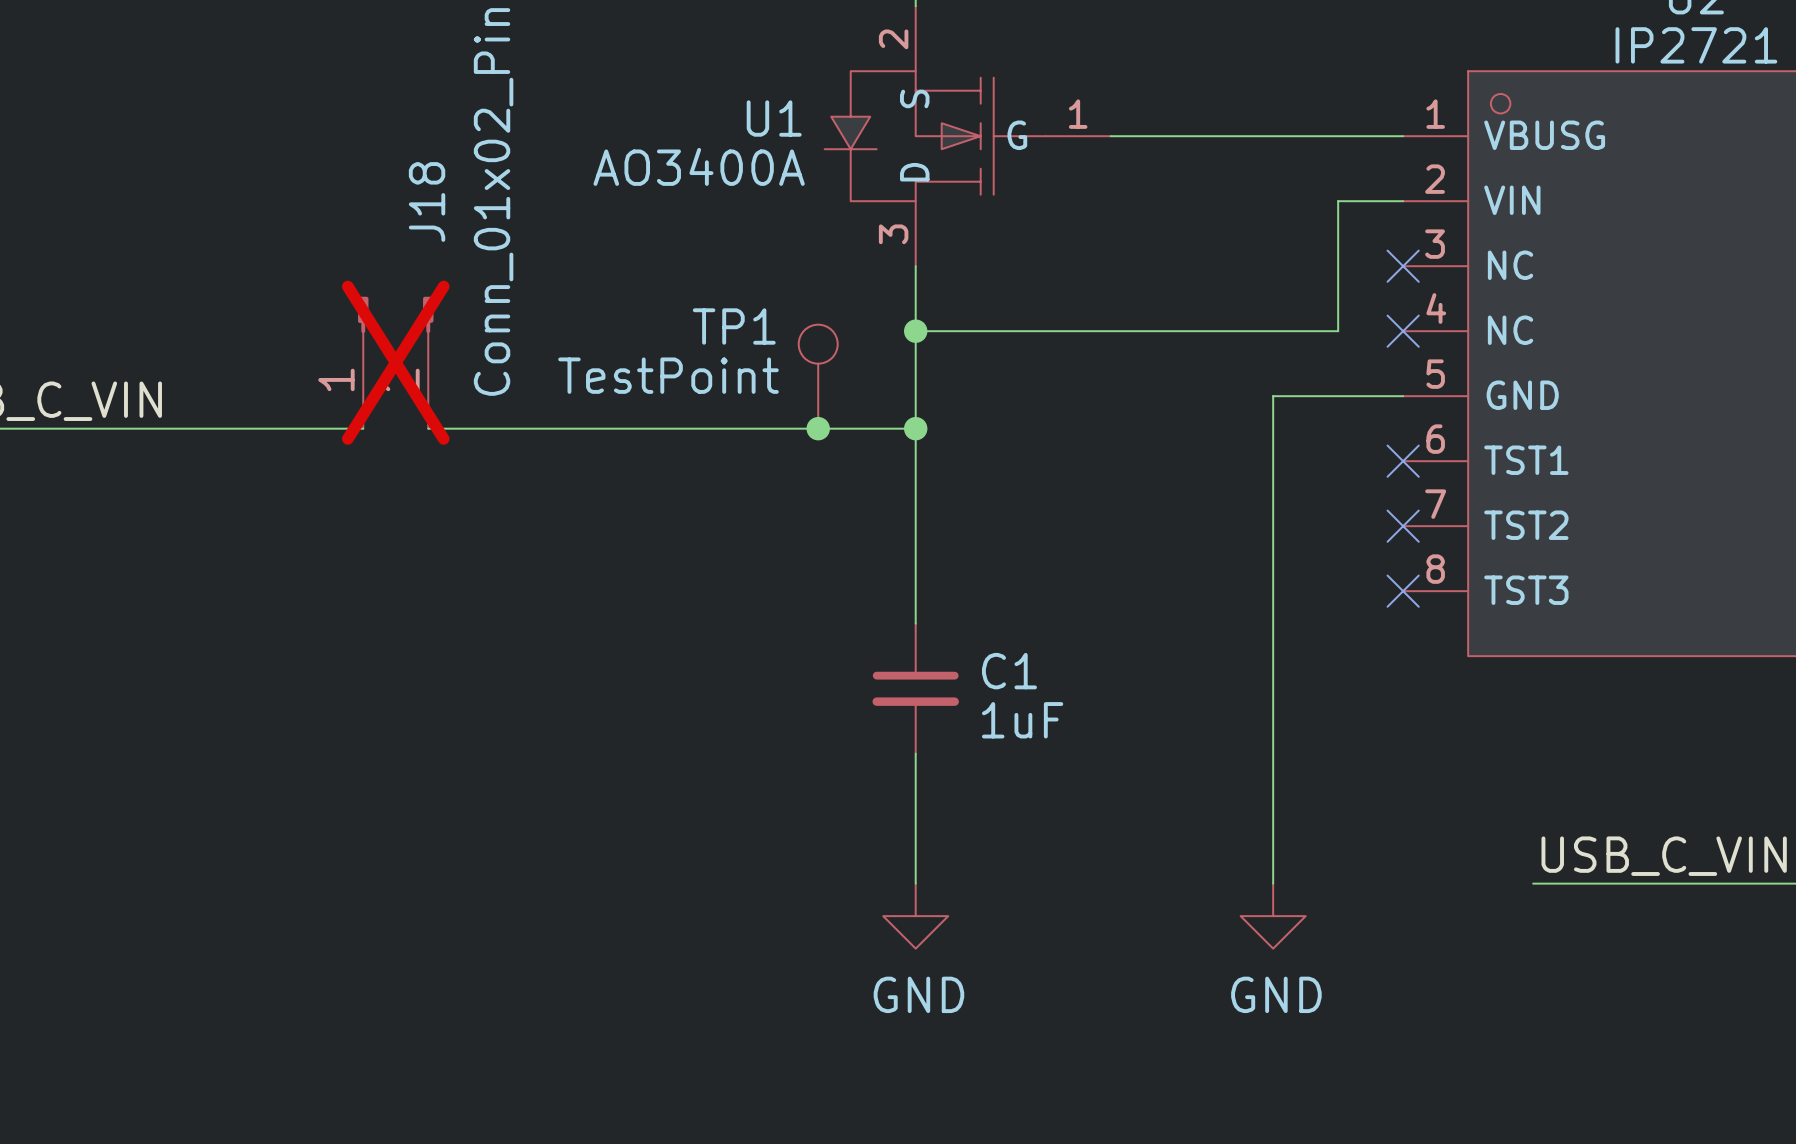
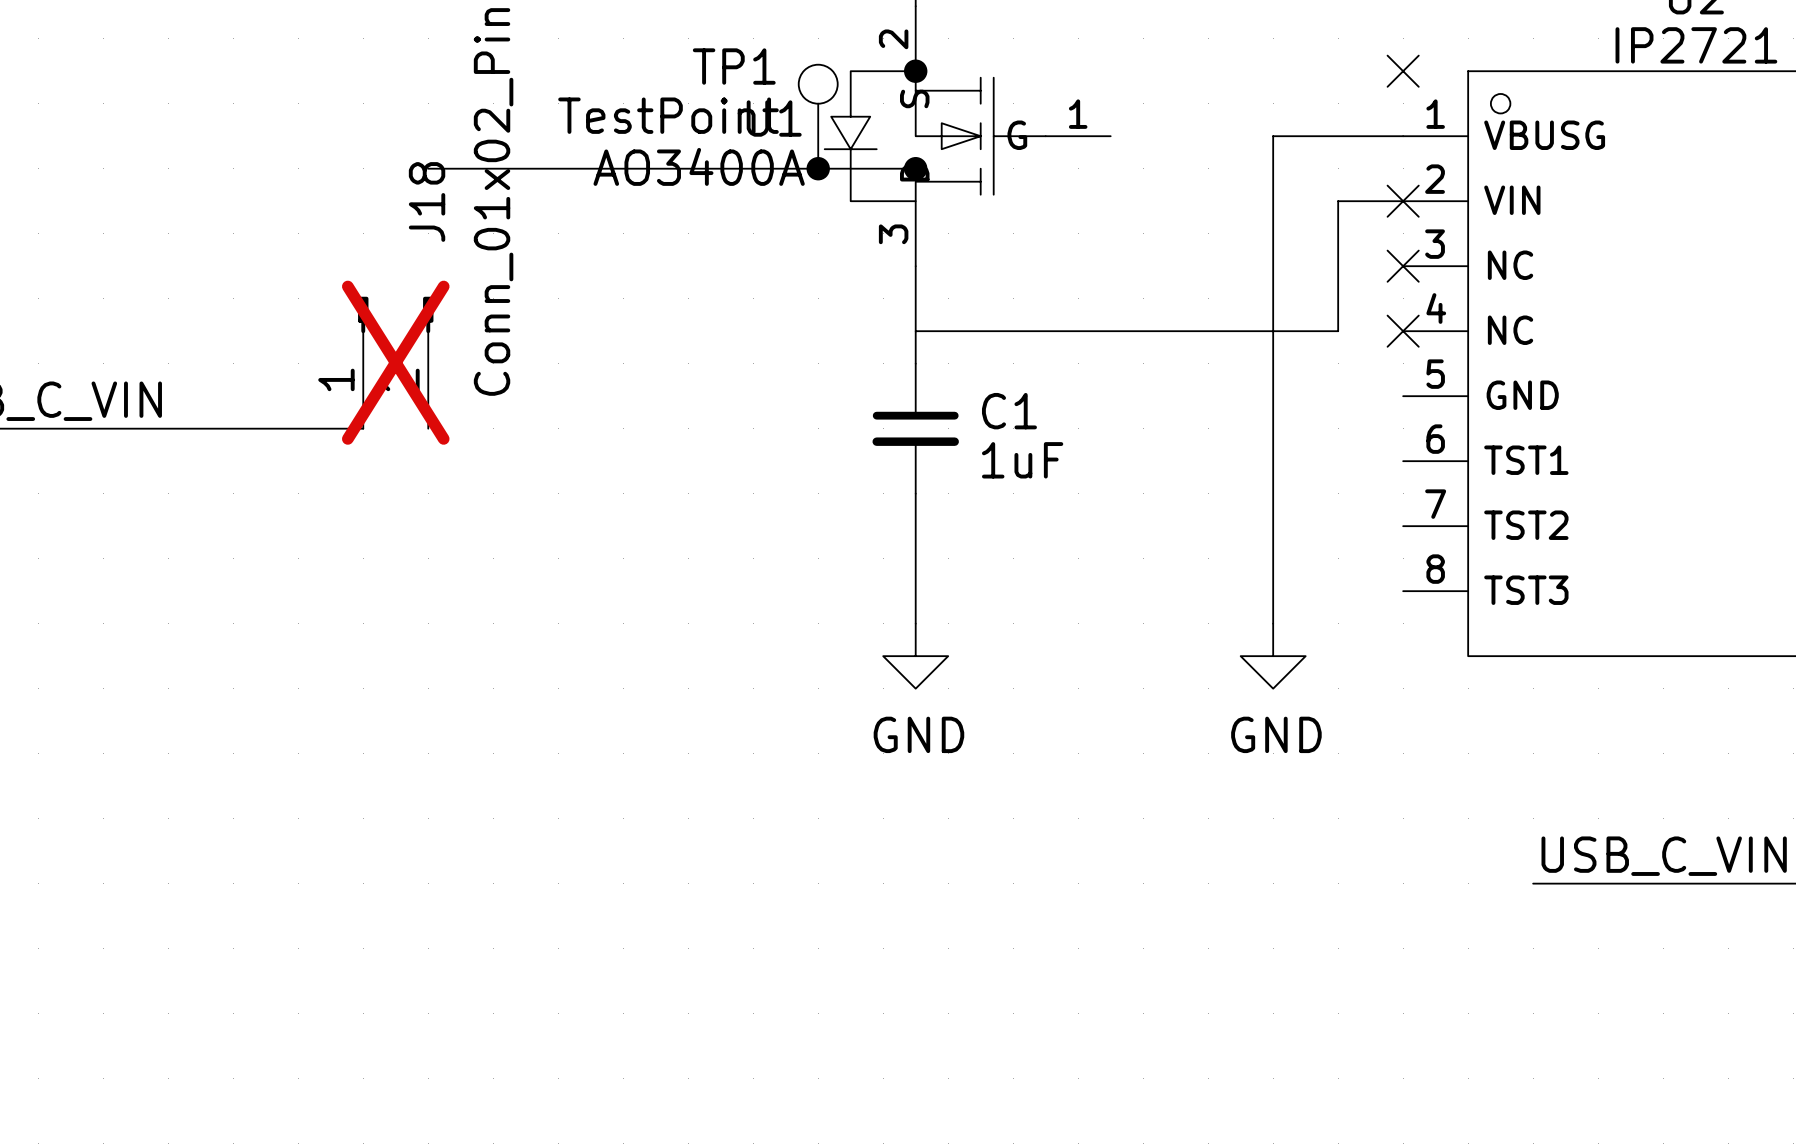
junction: none -> (915, 71)
no-connect mark: none -> (1403, 71)
wire: (1110, 136) (1273, 136) -> none
junction: none -> (818, 168)
junction: none -> (915, 168)
no-connect mark: none -> (1403, 201)
junction: (915, 331) -> none
TP1 position: (818, 376) -> (818, 116)
wire: (1273, 396) (1403, 396) -> (1273, 396) (1273, 136)
wire: (428, 428) (915, 428) -> (428, 168) (915, 168)
junction: (818, 428) -> none
junction: (915, 428) -> none
no-connect mark: (1403, 461) -> none
no-connect mark: (1403, 526) -> none
no-connect mark: (1403, 591) -> none
wire: (1273, 623) (1273, 883) -> none
power symbol: none -> GND (915, 656)
power symbol: none -> GND (1273, 656)
C1 position: (915, 688) -> (915, 428)
wire: (915, 753) (915, 883) -> none
power symbol: GND (915, 916) -> none
power symbol: GND (1273, 916) -> none

